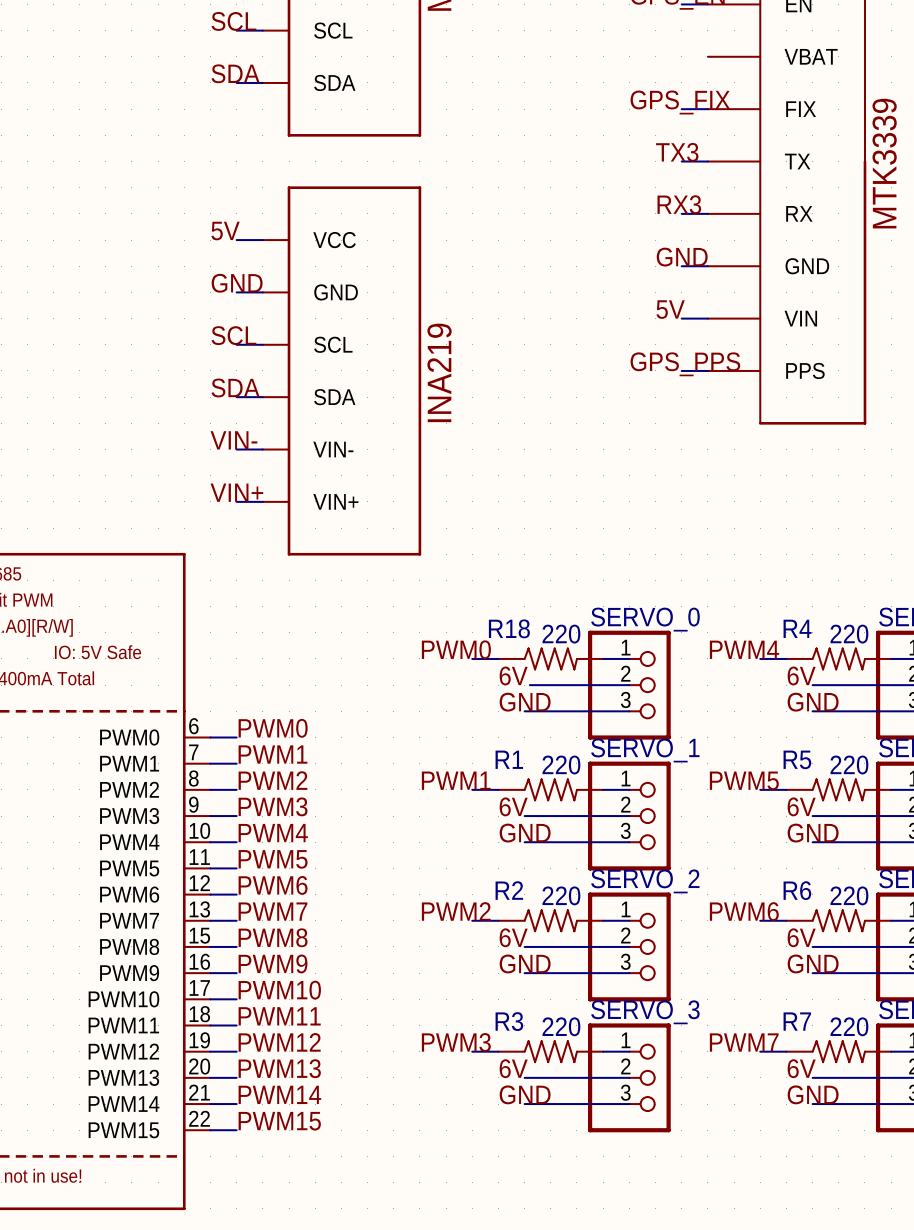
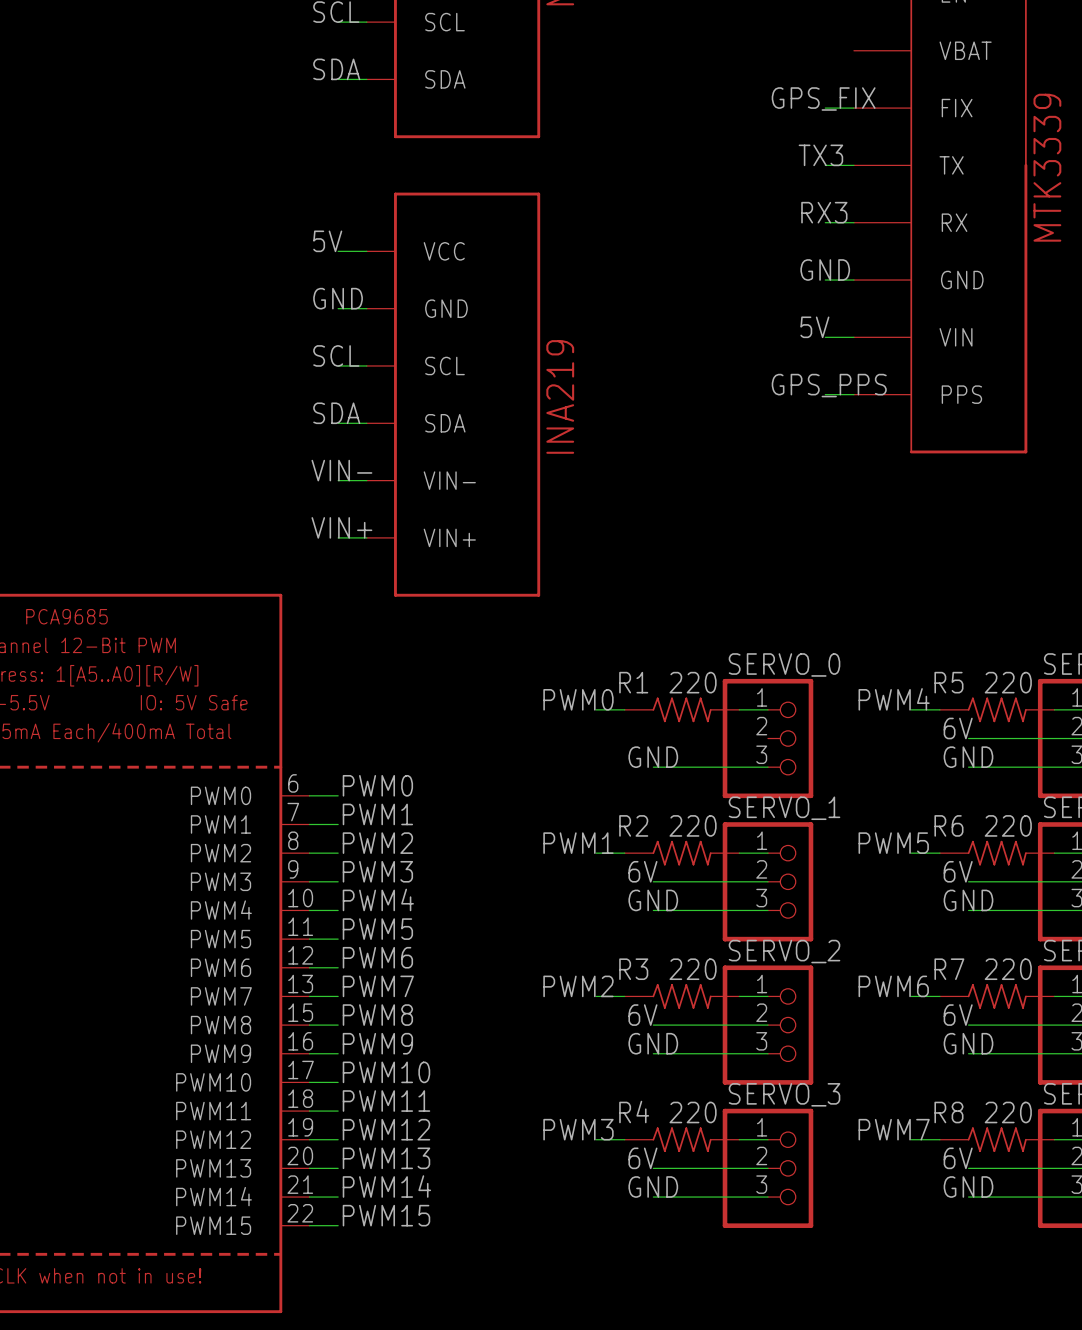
R18 name: R18 (509, 628) -> R1 (633, 682)
R4 name: R4 (797, 628) -> R5 (948, 682)
label: 6V (513, 675) -> none
wire: (529, 685) (629, 685) -> none
R1 name: R1 (509, 759) -> R2 (633, 825)
R5 name: R5 (797, 759) -> R6 (948, 825)
R2 name: R2 (509, 890) -> R3 (633, 969)
R6 name: R6 (797, 890) -> R7 (949, 969)
R3 name: R3 (509, 1021) -> R4 (634, 1112)
R7 name: R7 (797, 1021) -> R8 (948, 1112)

